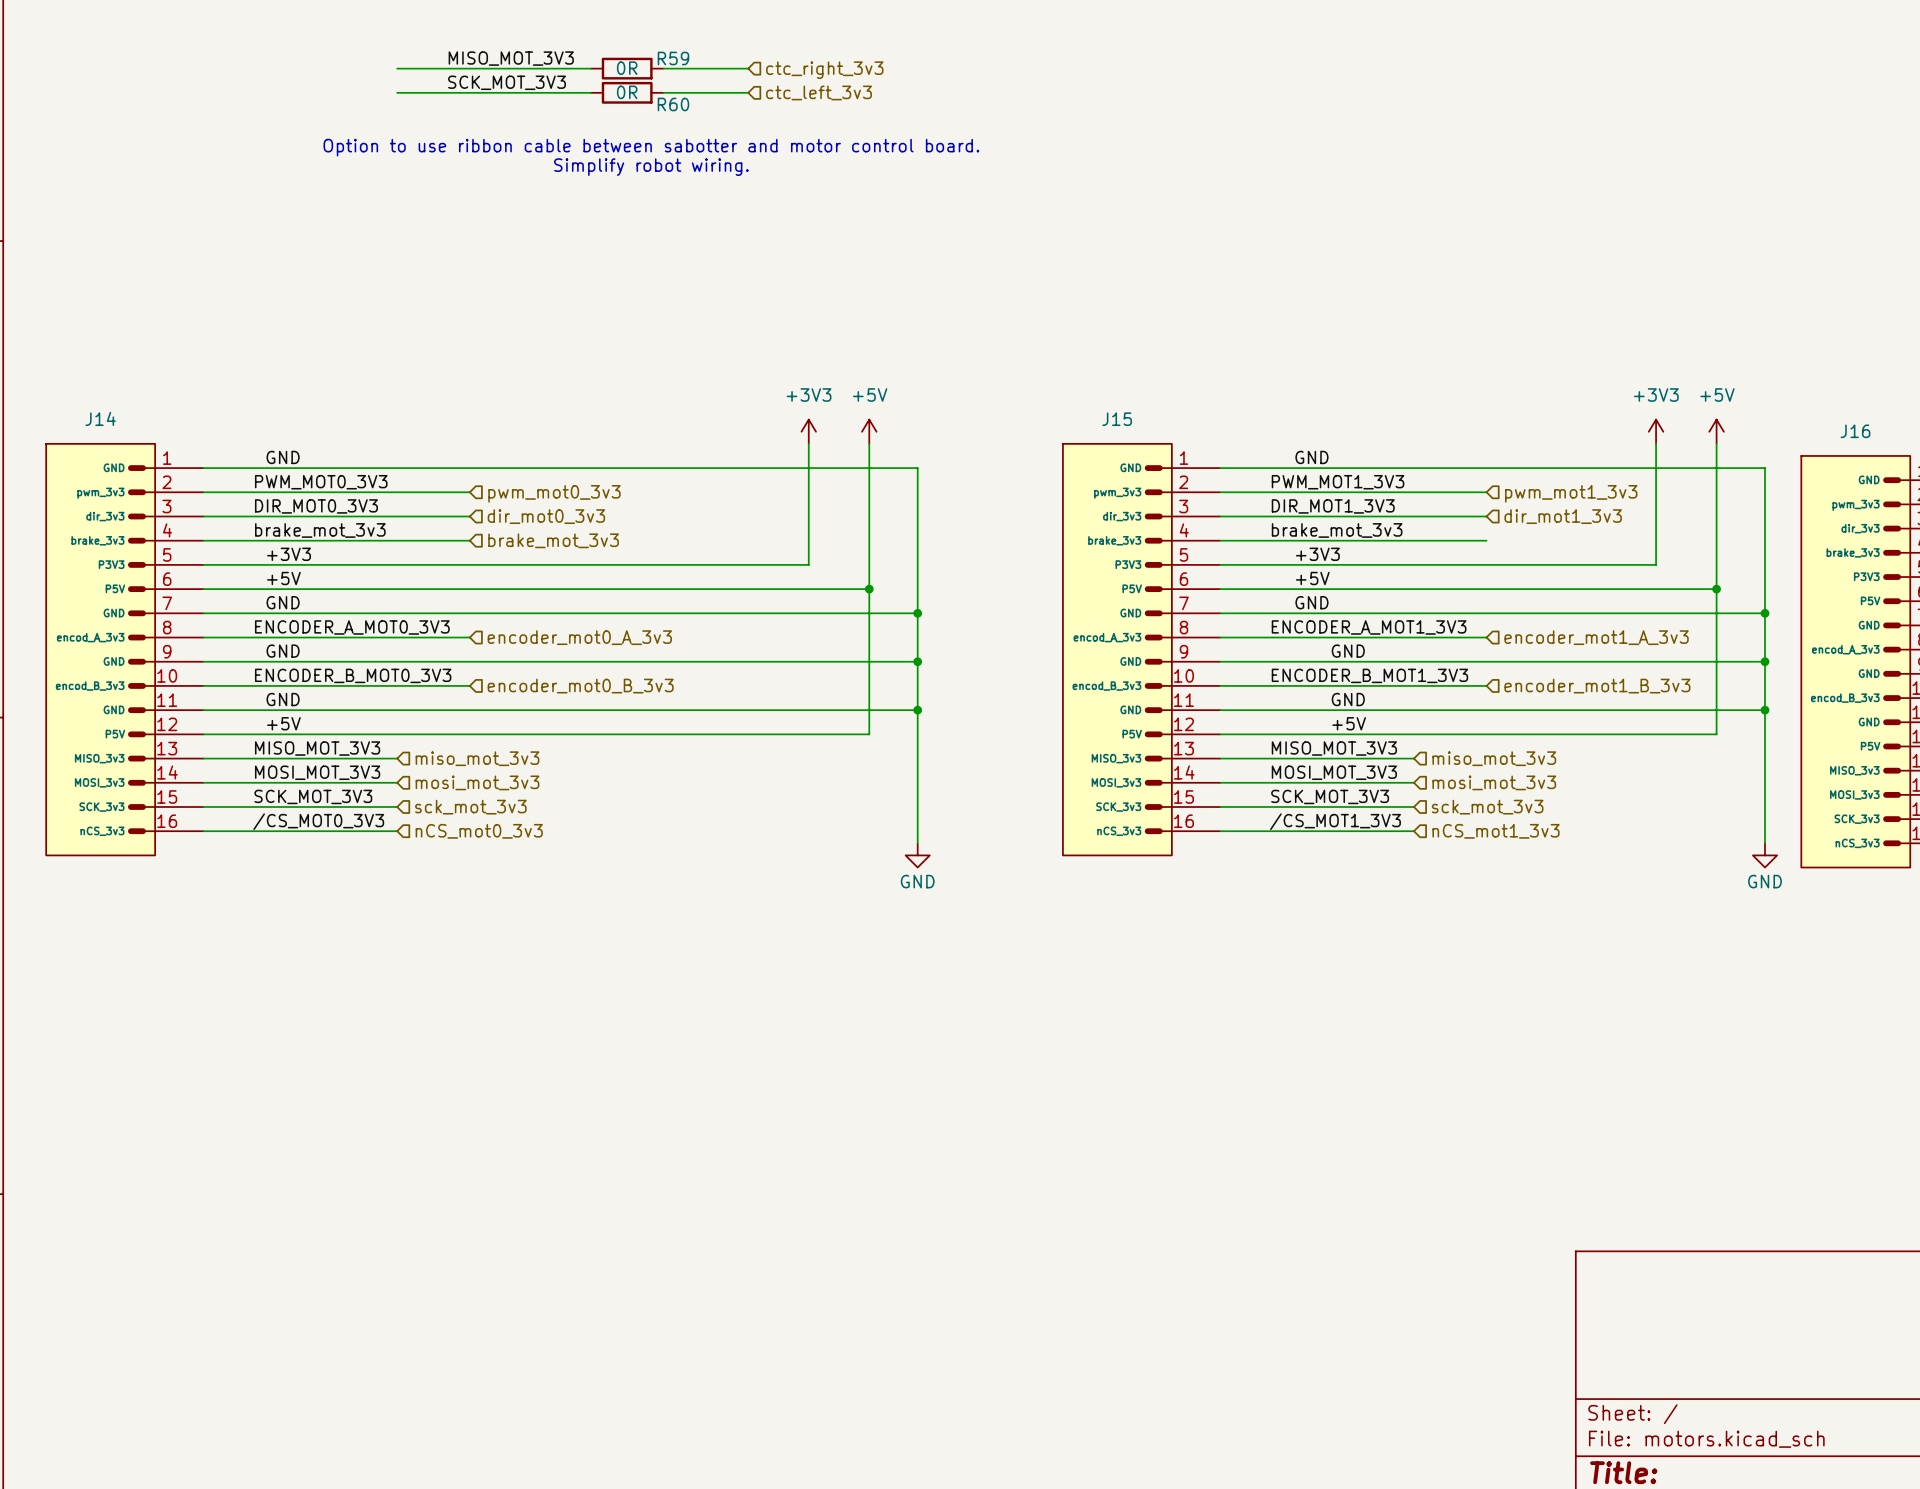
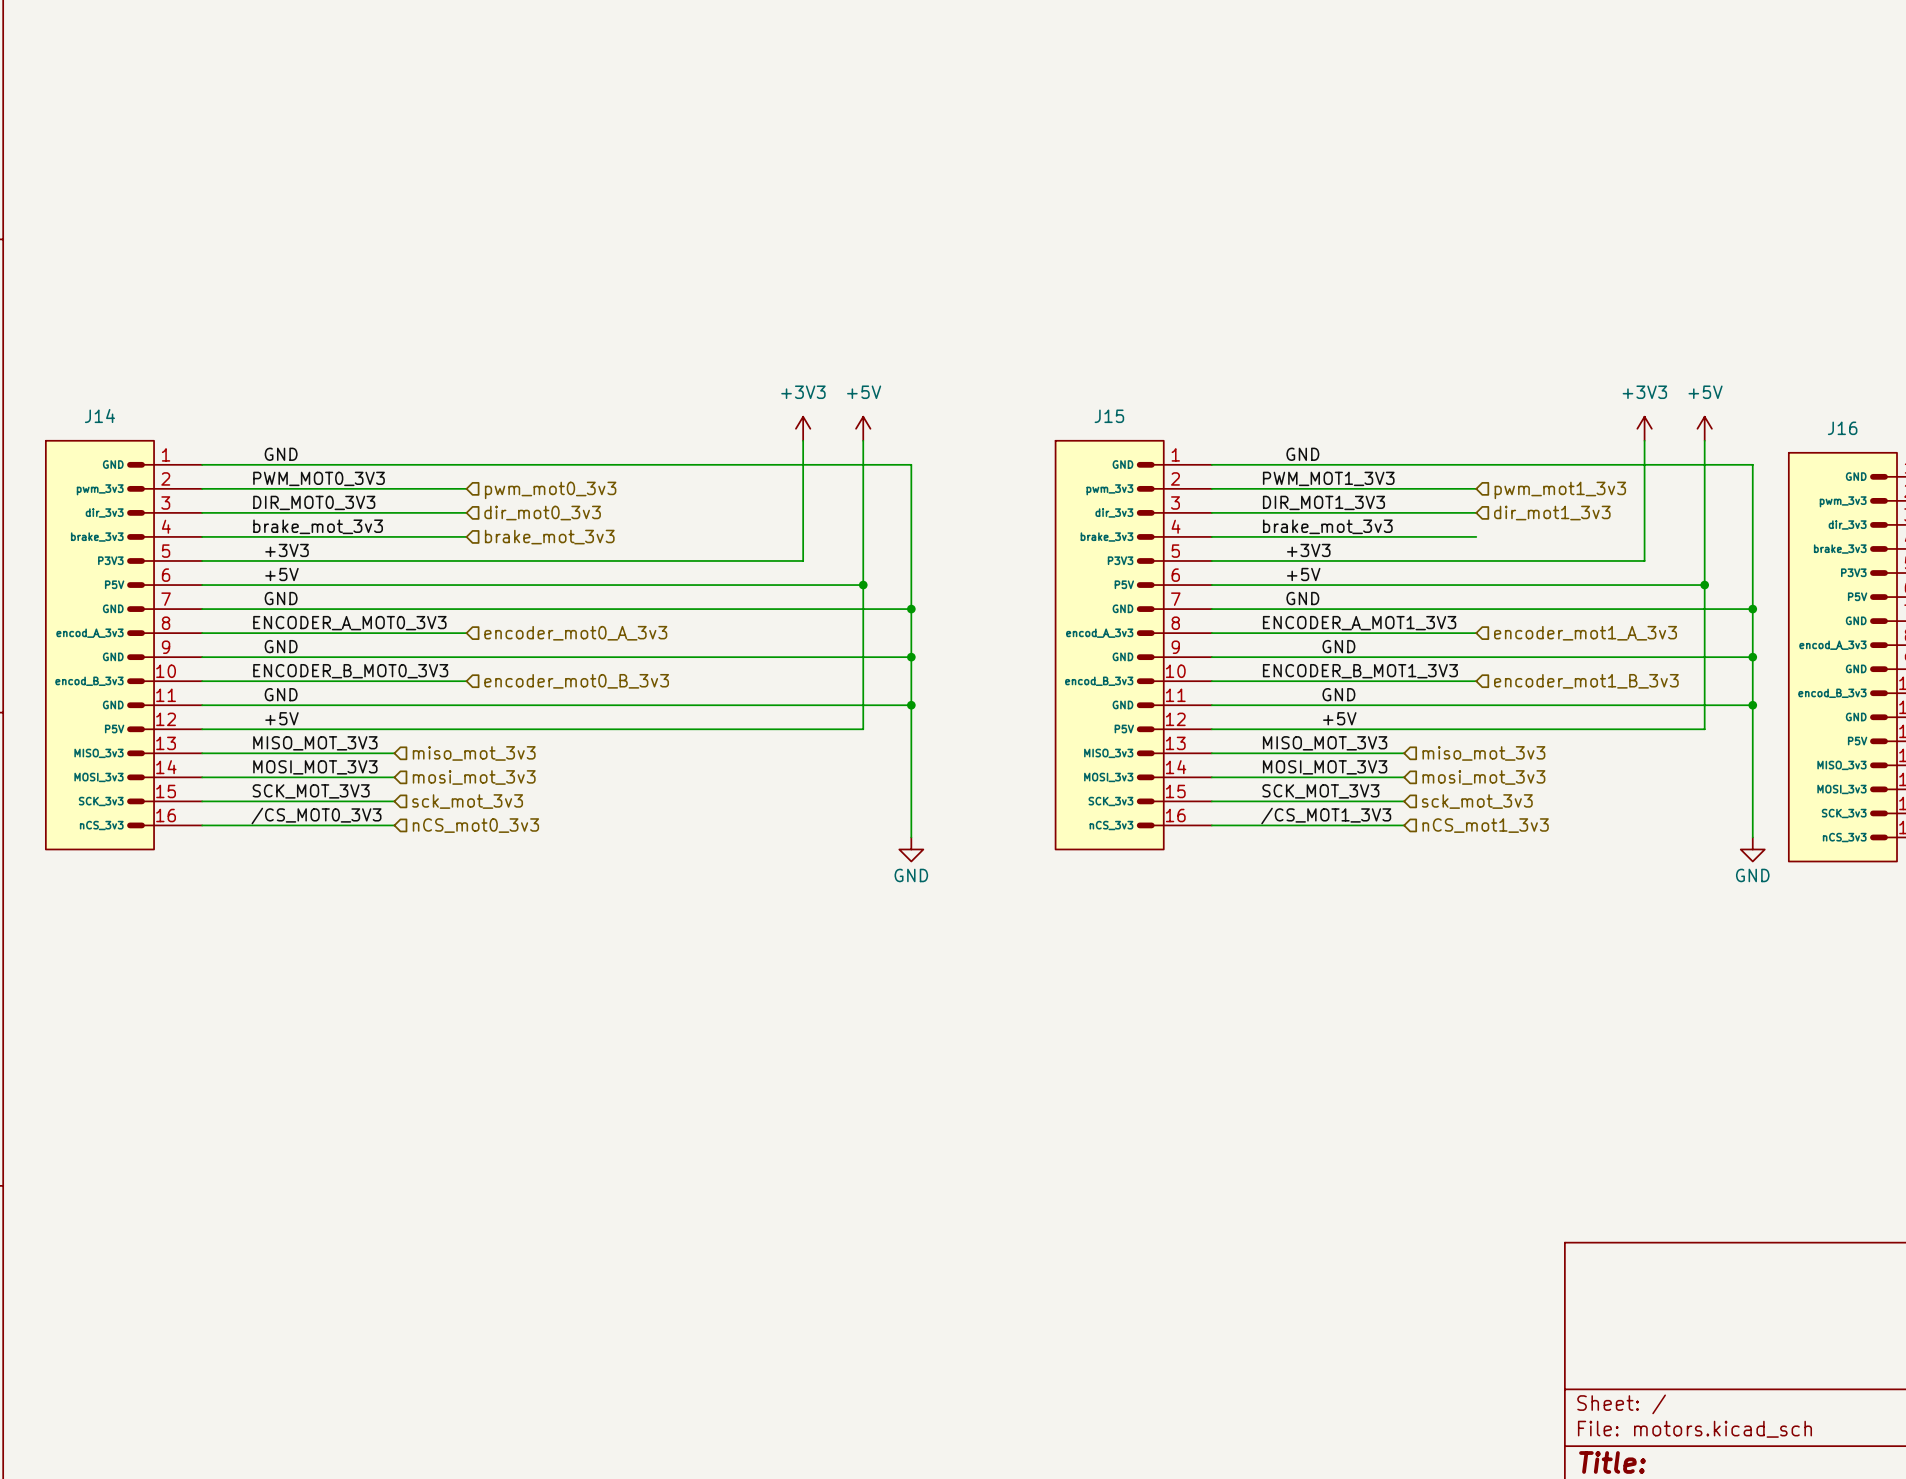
label: MISO_MOT_3V3 (511, 58) -> none
wire: (397, 68) (590, 68) -> none
R59: 0R (627, 68) -> none
wire: (663, 68) (748, 68) -> none
hierarchical label: ctc_right_3v3 (824, 70) -> none
label: SCK_MOT_3V3 (507, 82) -> none
wire: (397, 92) (590, 92) -> none
R60: 0R (627, 92) -> none
wire: (663, 92) (748, 92) -> none
hierarchical label: ctc_left_3v3 (819, 92) -> none
text: Option to use ribbon cable between sabotter and motor control board. (651, 147) -> none
text: Simplify robot wiring. (651, 167) -> none

